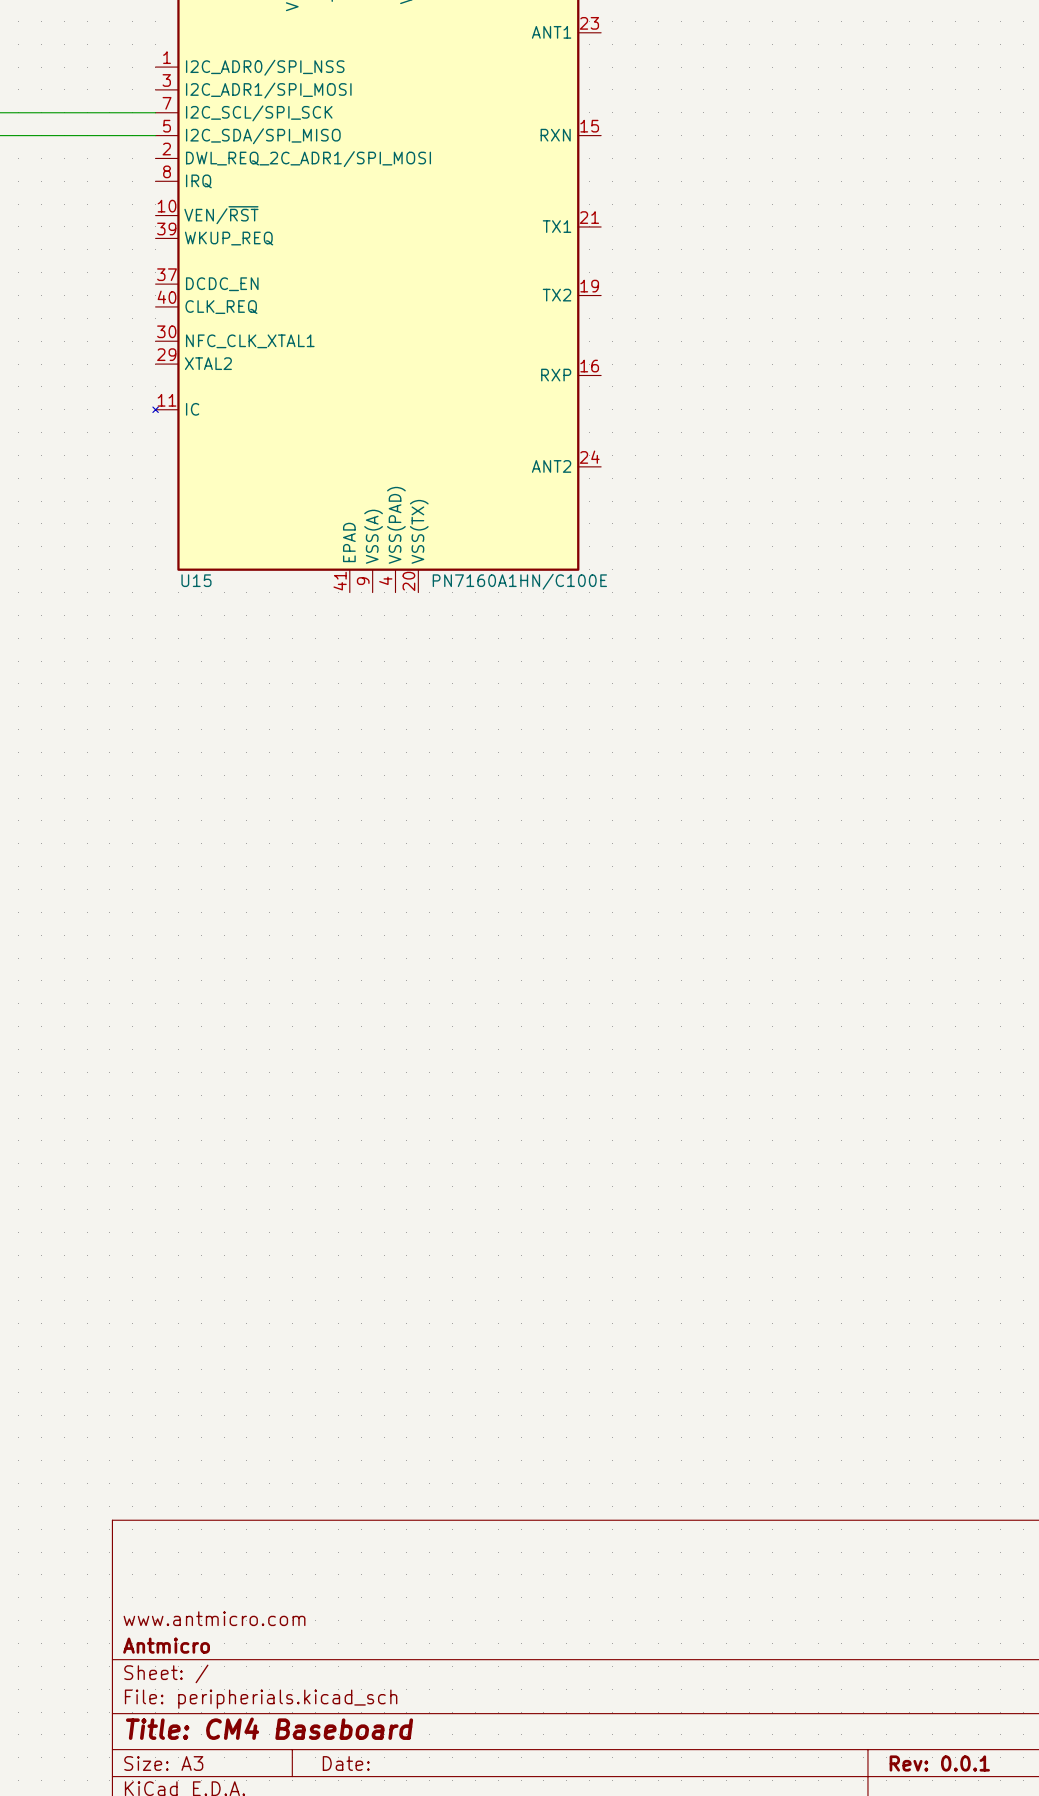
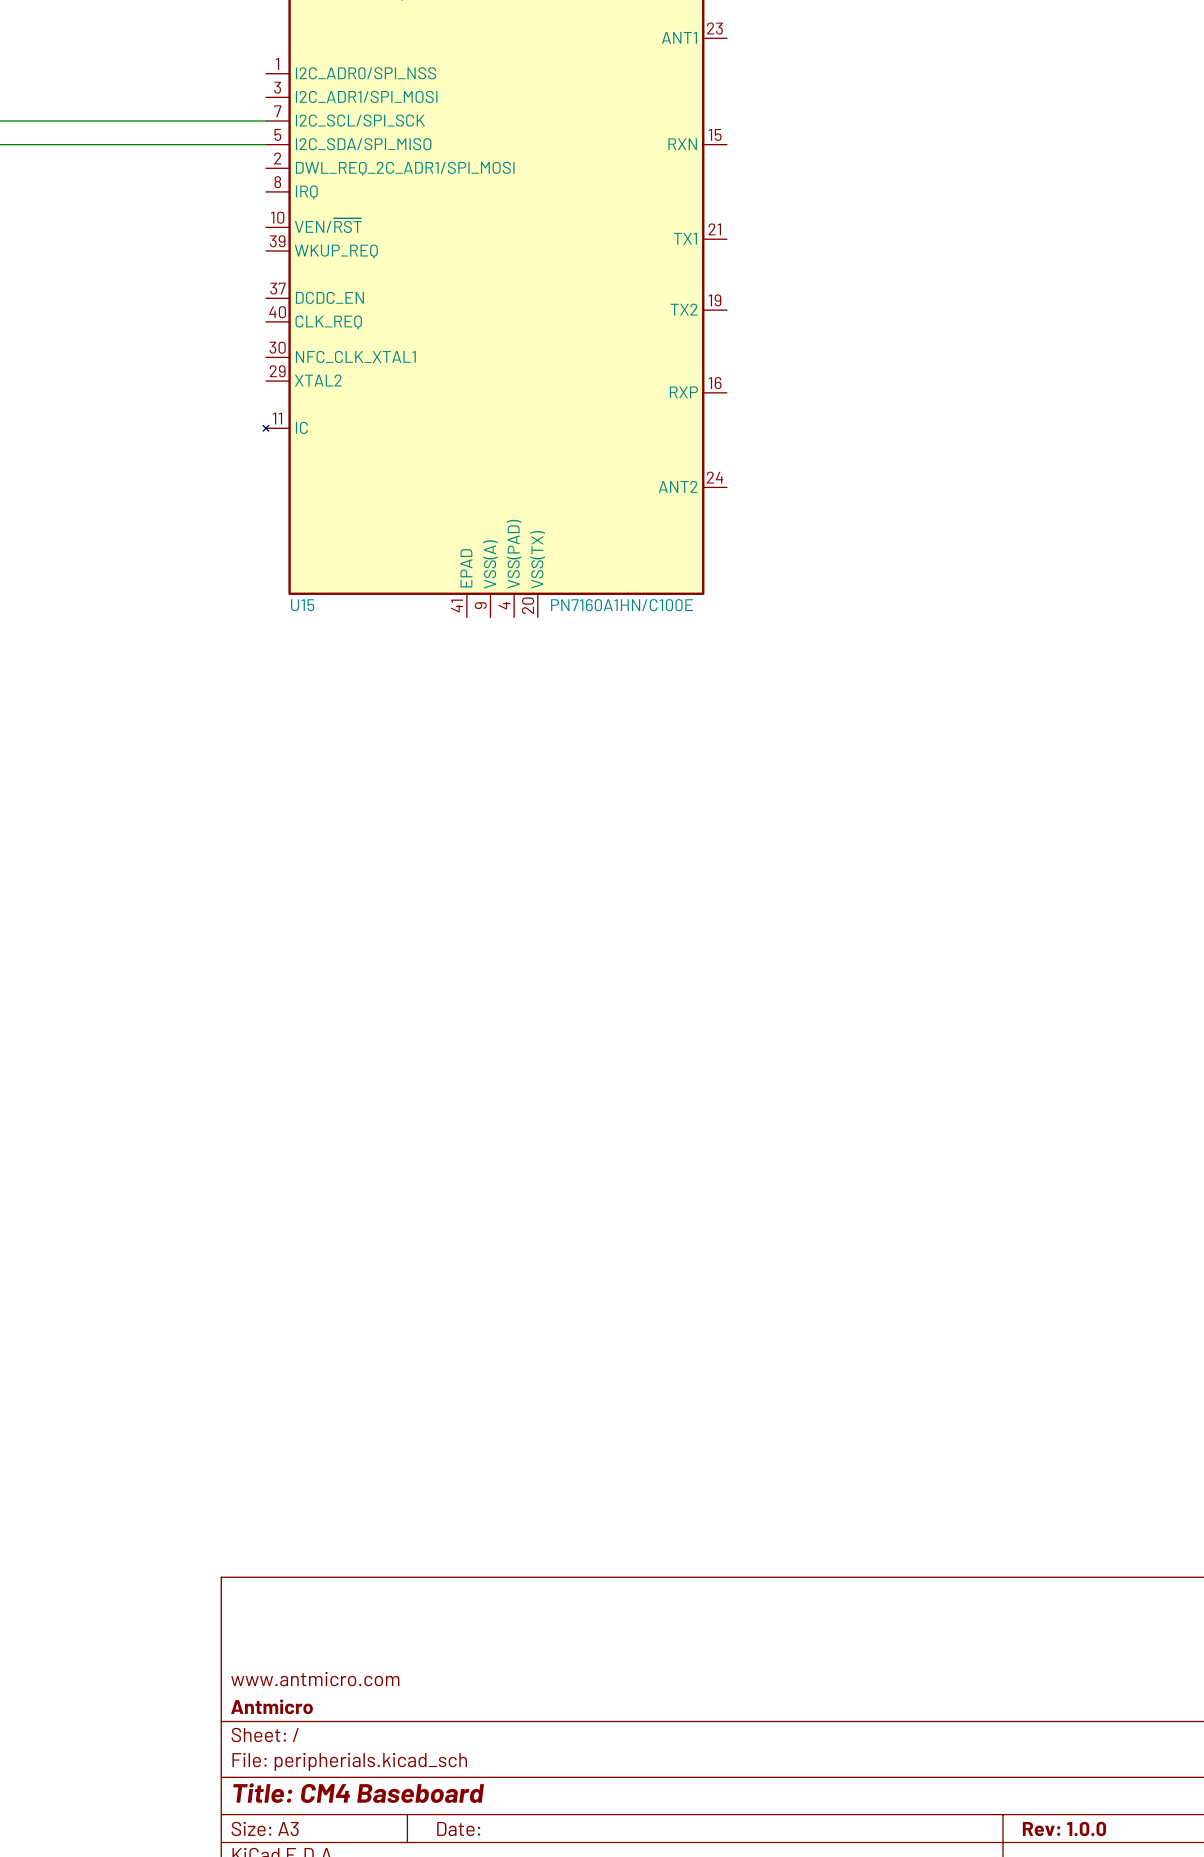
title block: Rev: 0.0.1 (939, 1763) -> Rev: 1.0.0 (1064, 1828)

